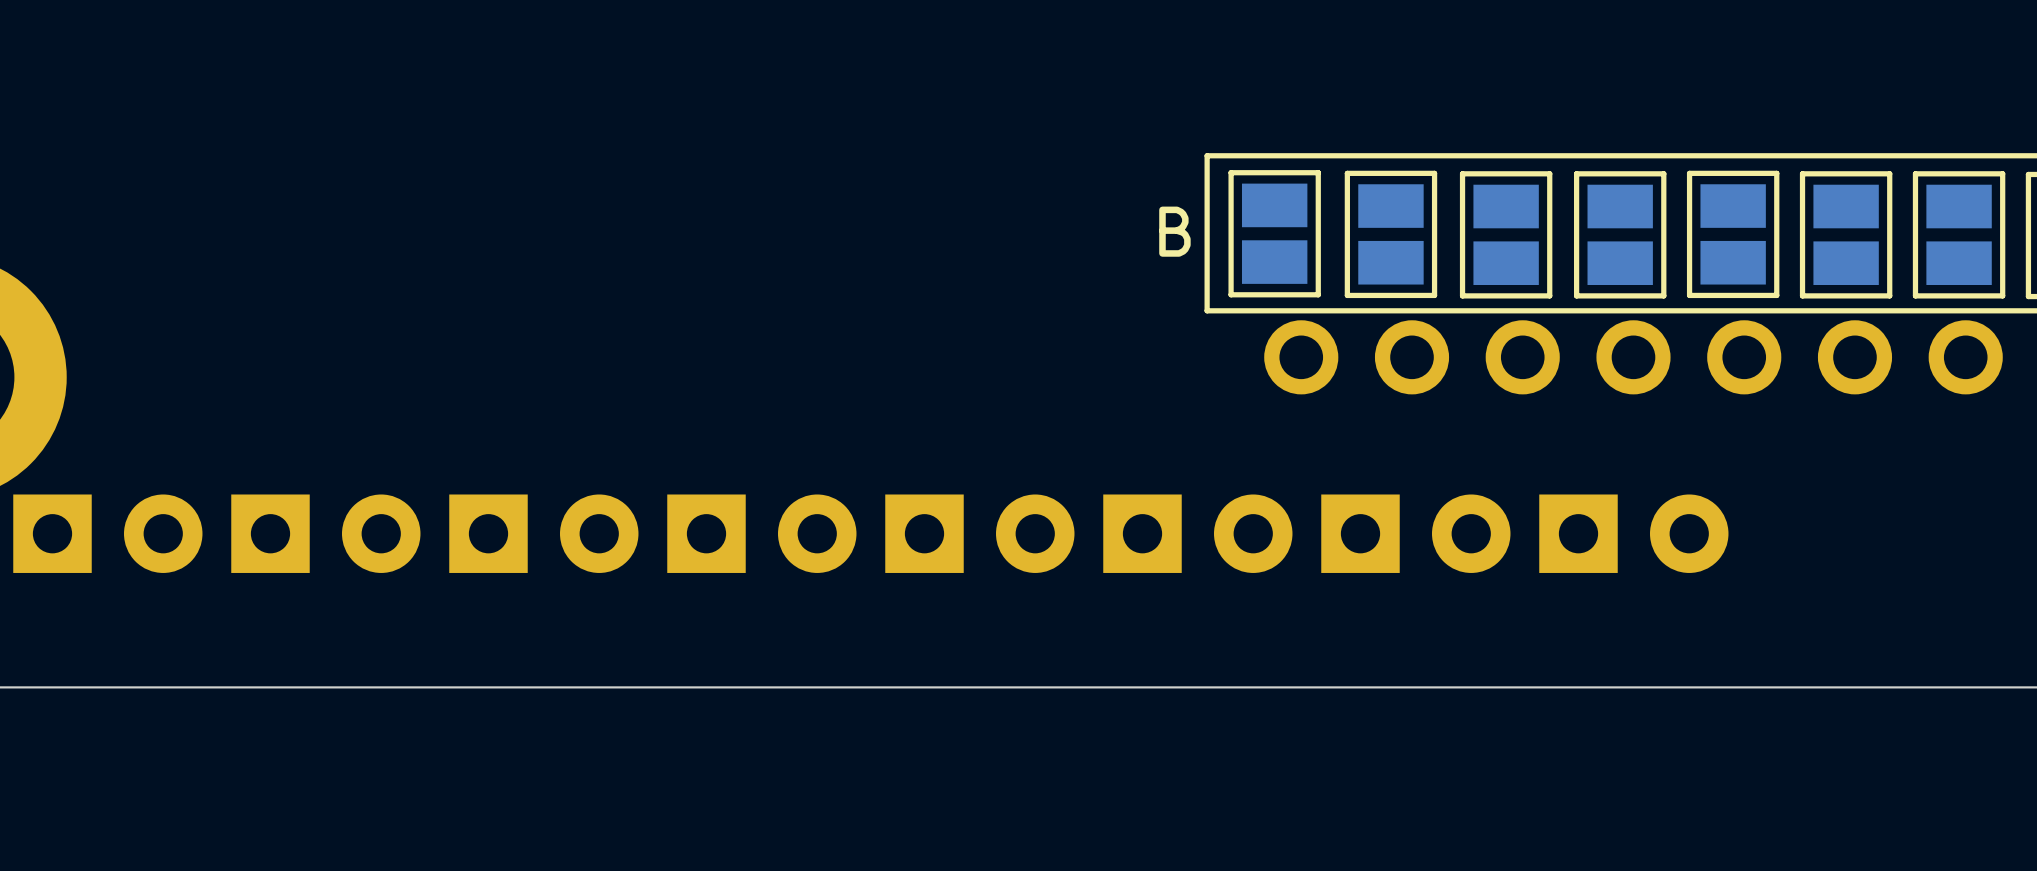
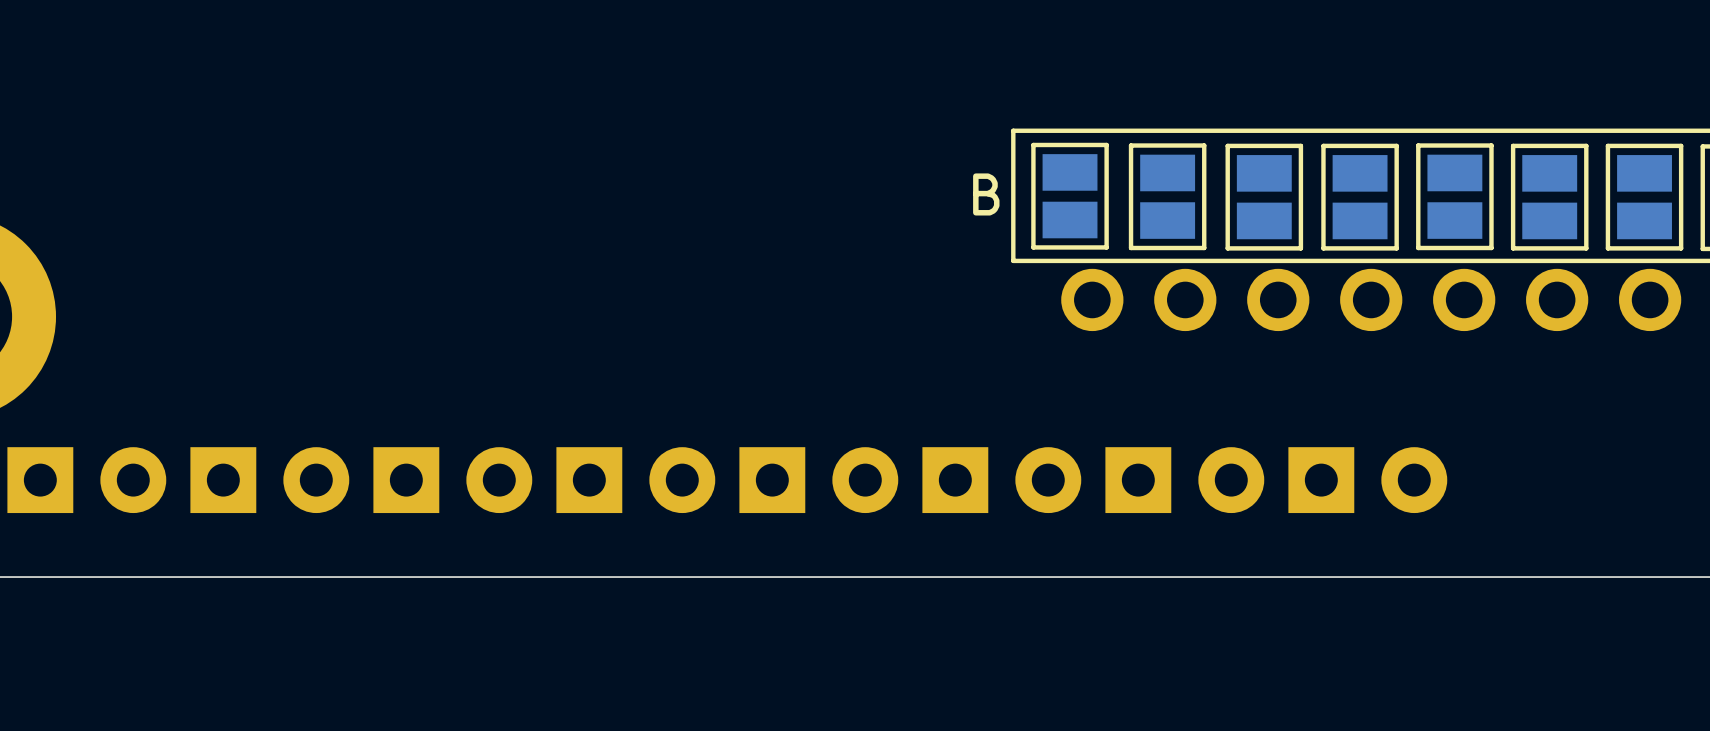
part position: (107, 533) -> (86, 480)
part position: (325, 533) -> (269, 480)
part position: (543, 533) -> (452, 480)
part position: (761, 533) -> (635, 480)
part position: (979, 533) -> (818, 480)
part position: (1197, 533) -> (1001, 480)
part position: (1415, 533) -> (1184, 480)
part position: (1633, 533) -> (1367, 480)

